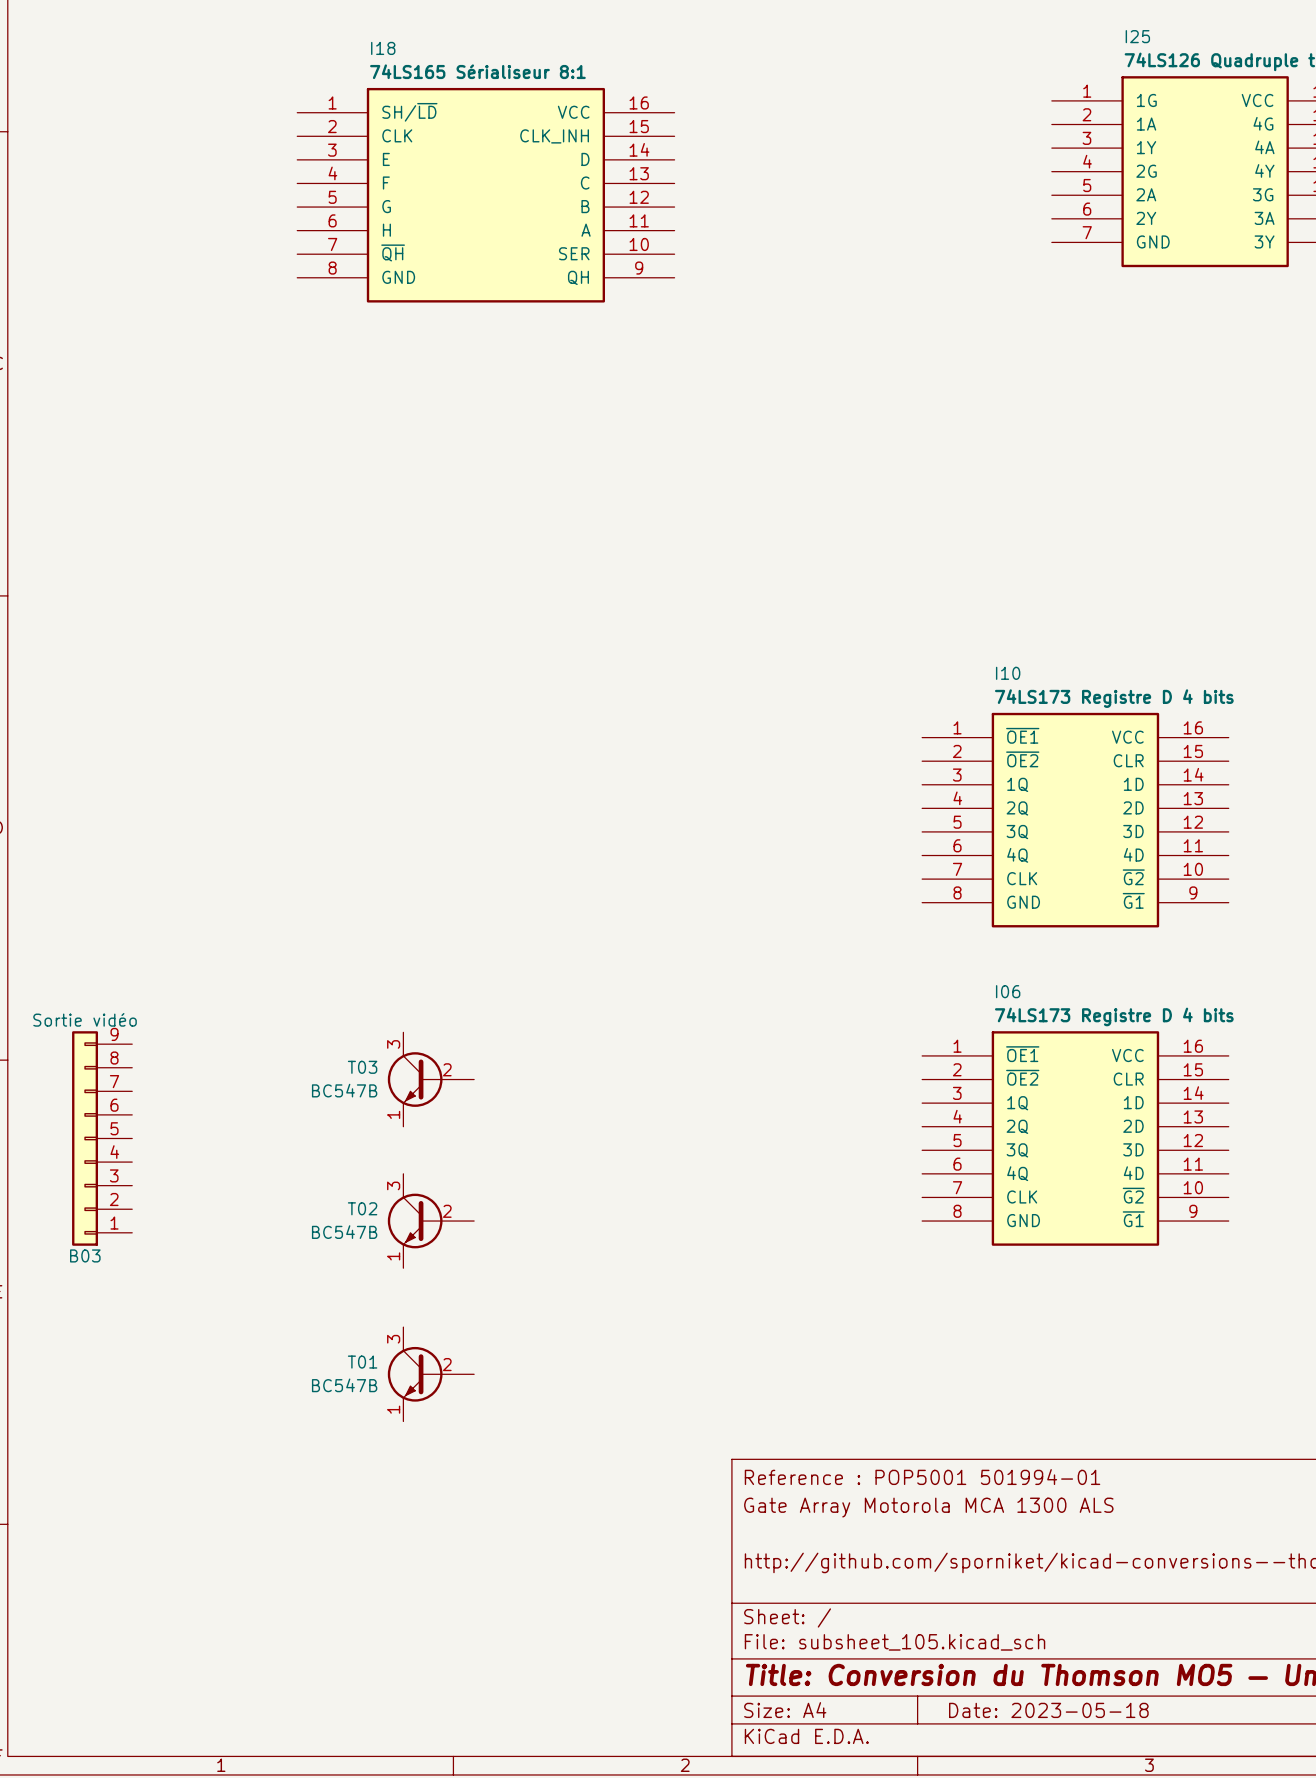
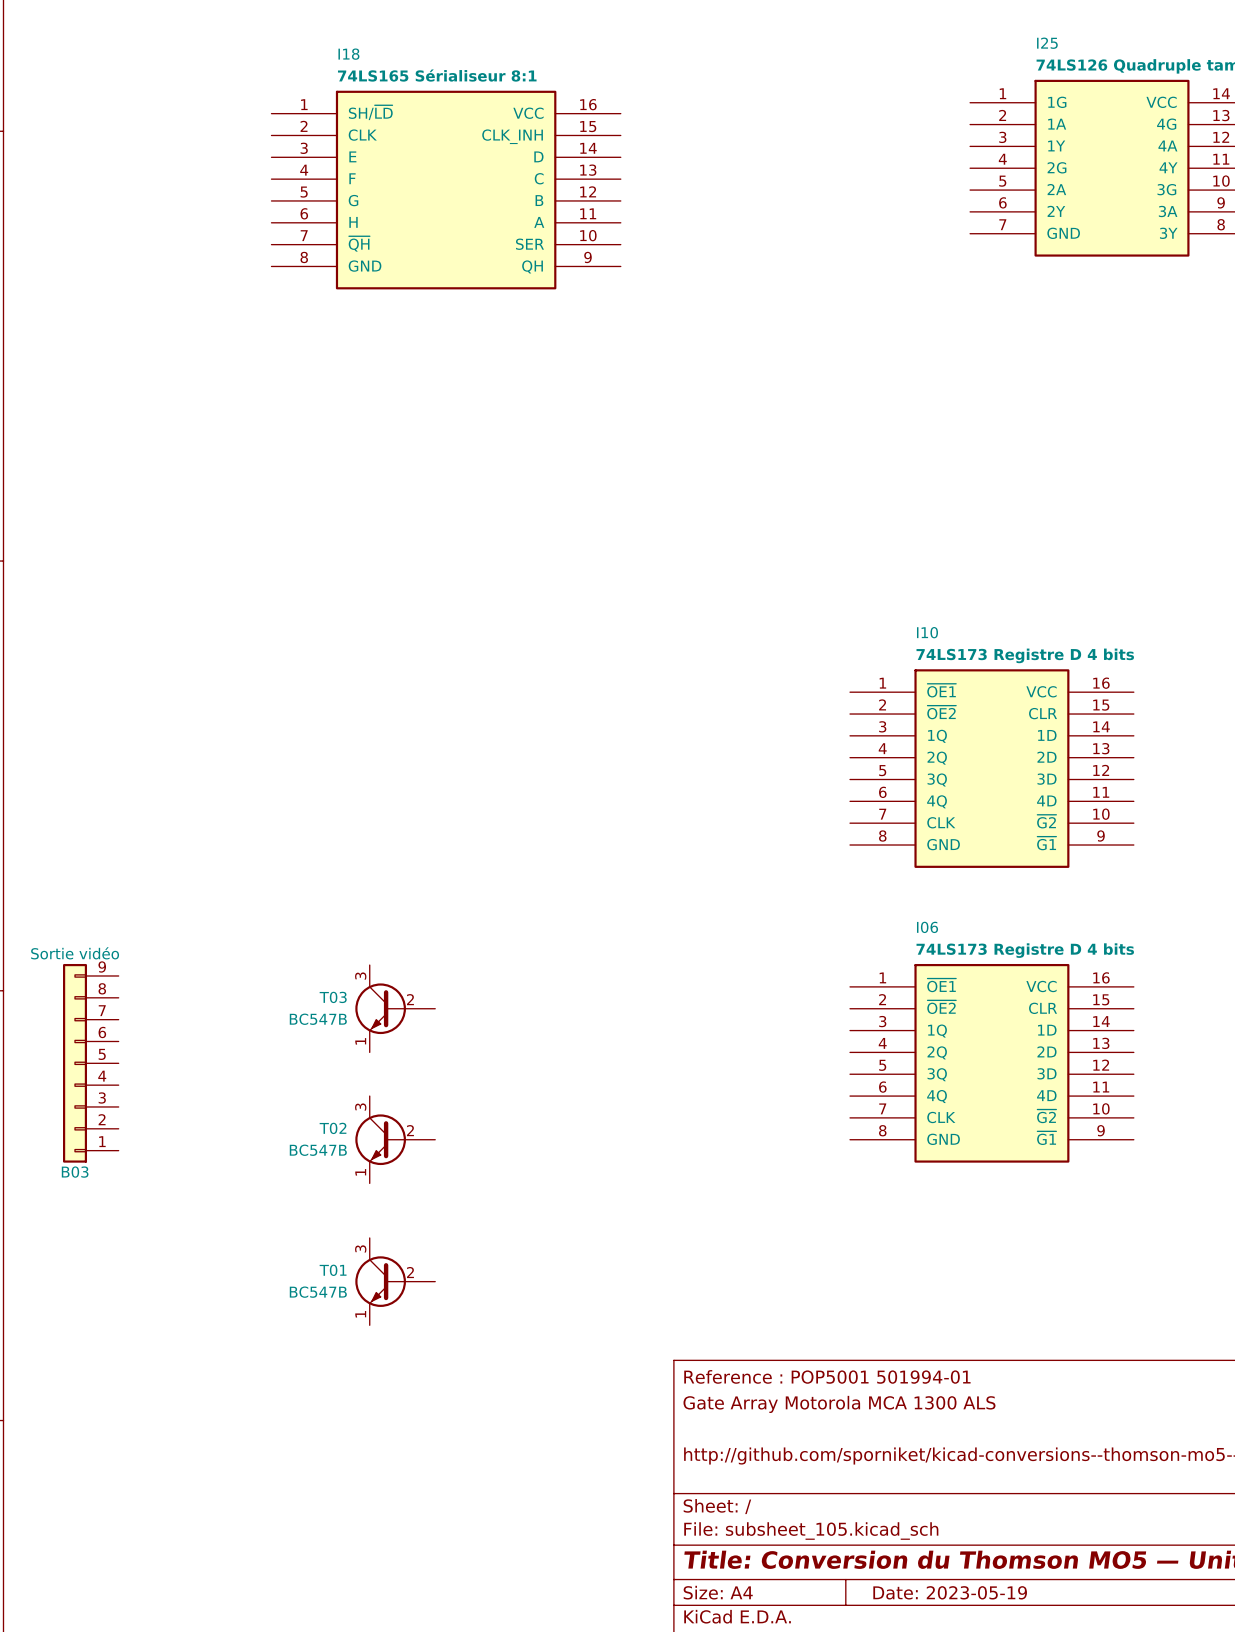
title block: Date: 2023-05-18 (1048, 1710) -> Date: 2023-05-19 (950, 1592)

